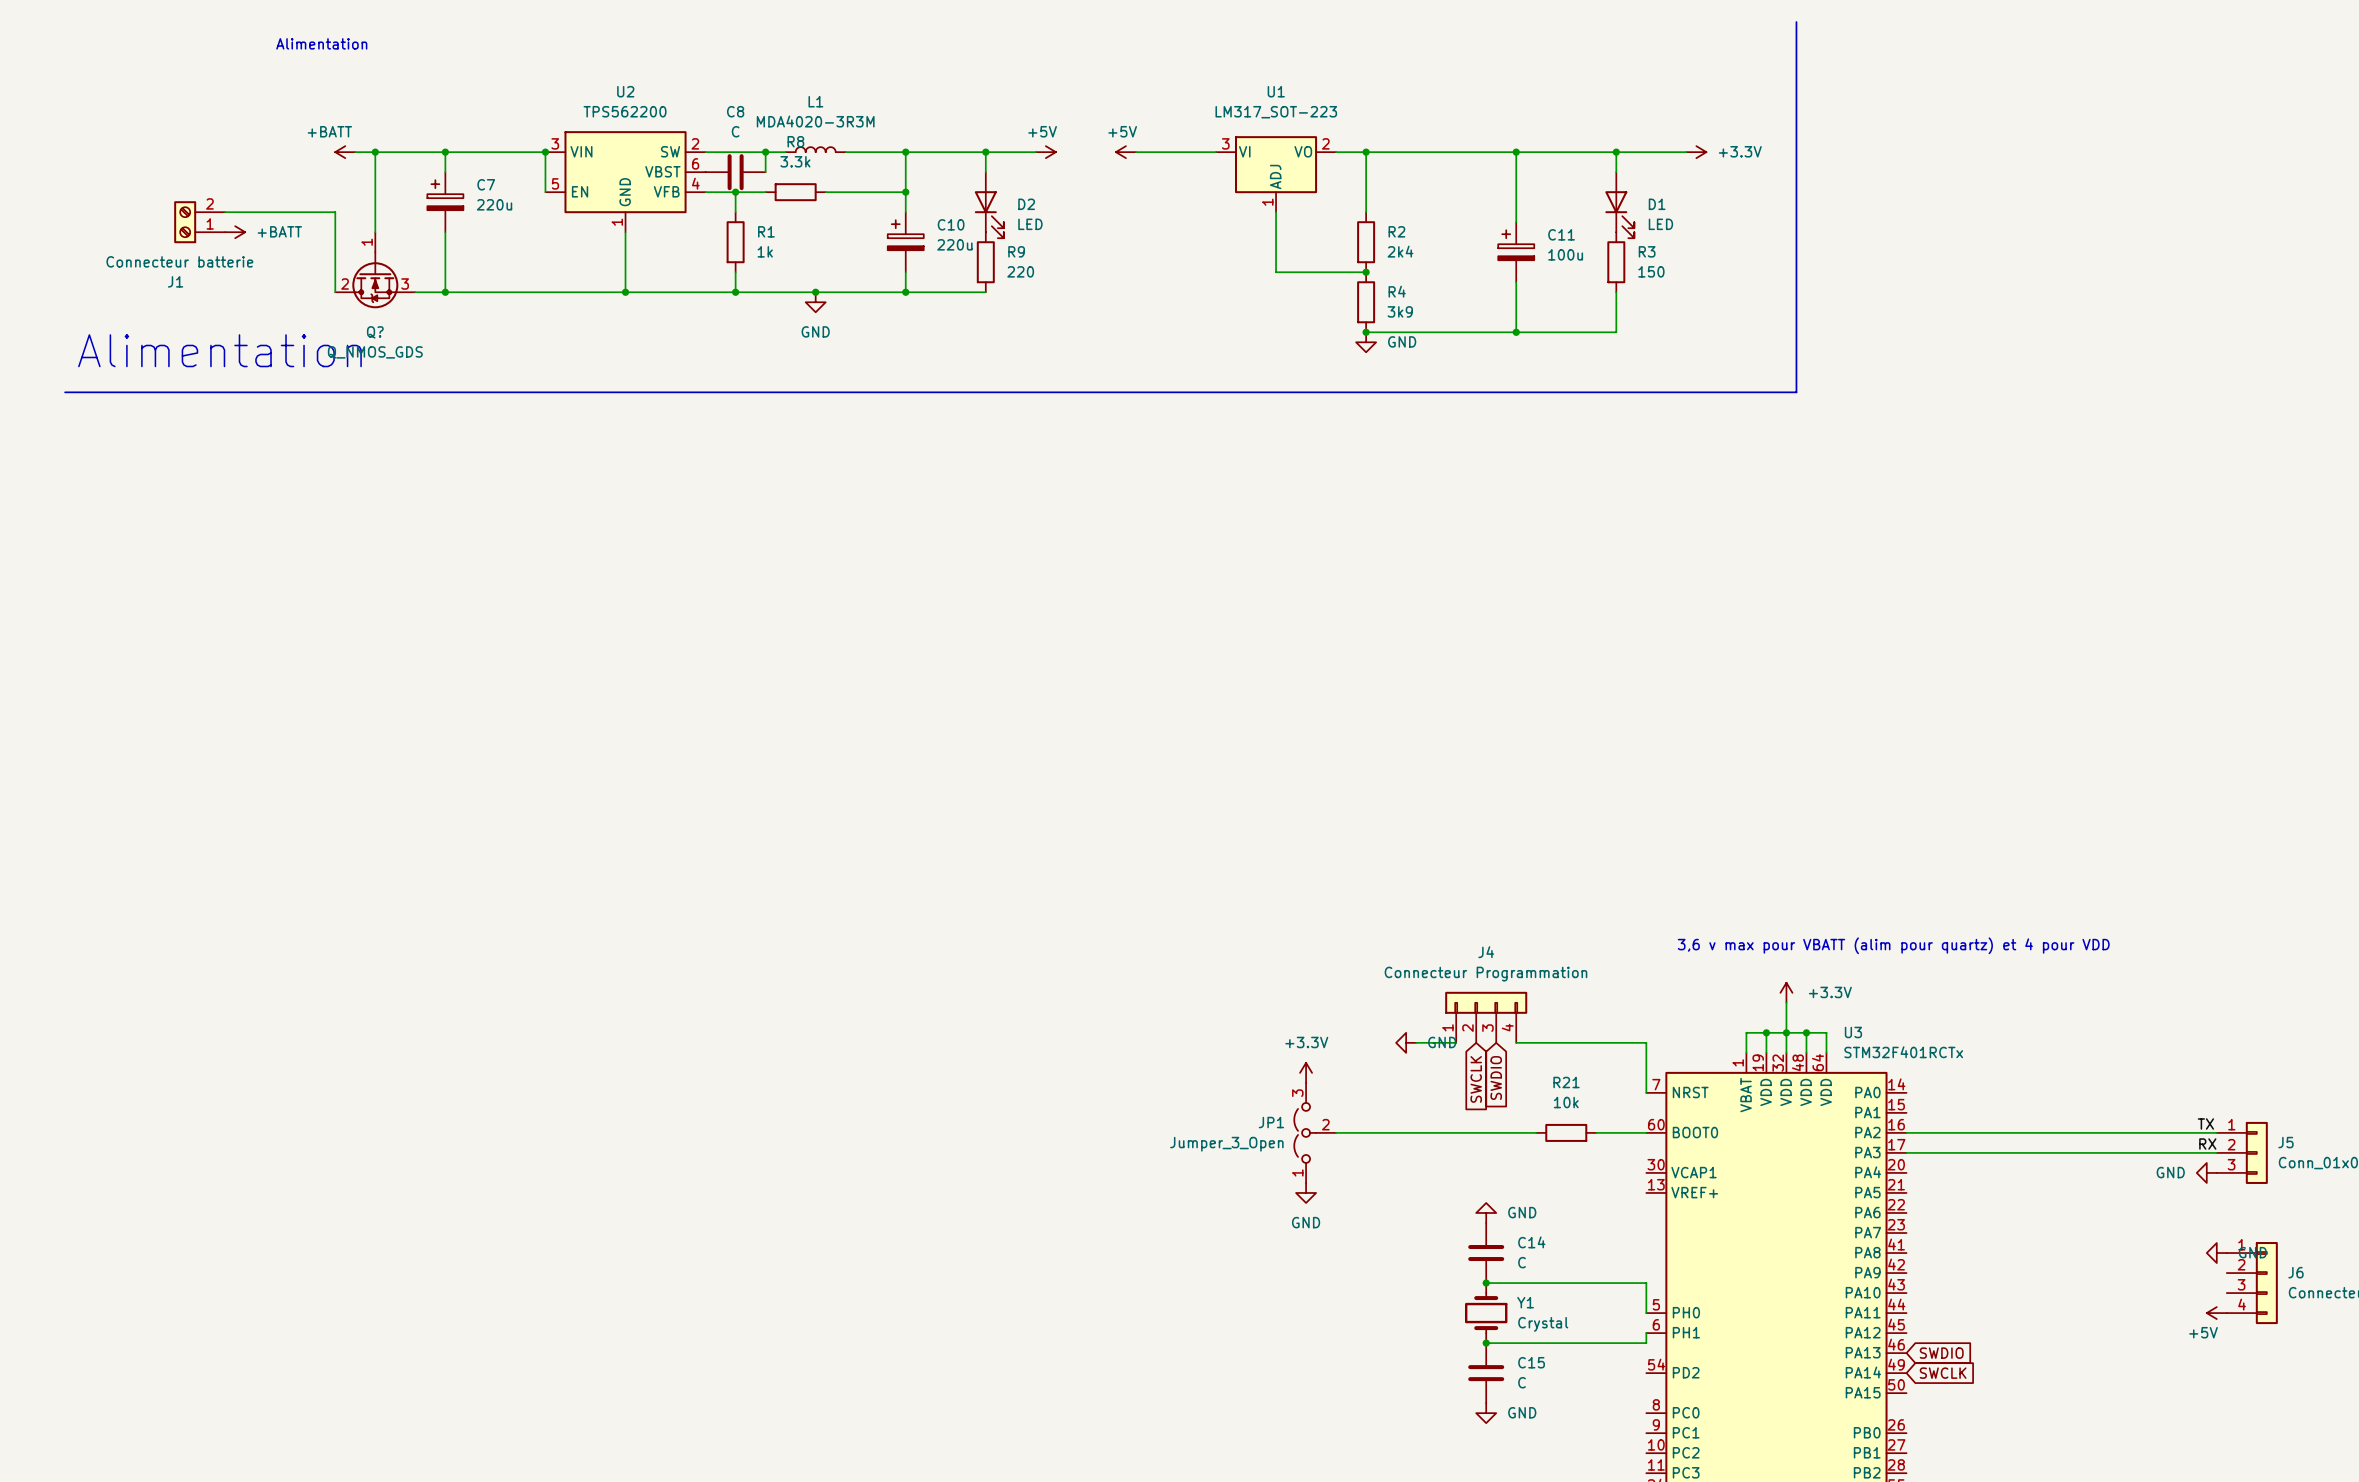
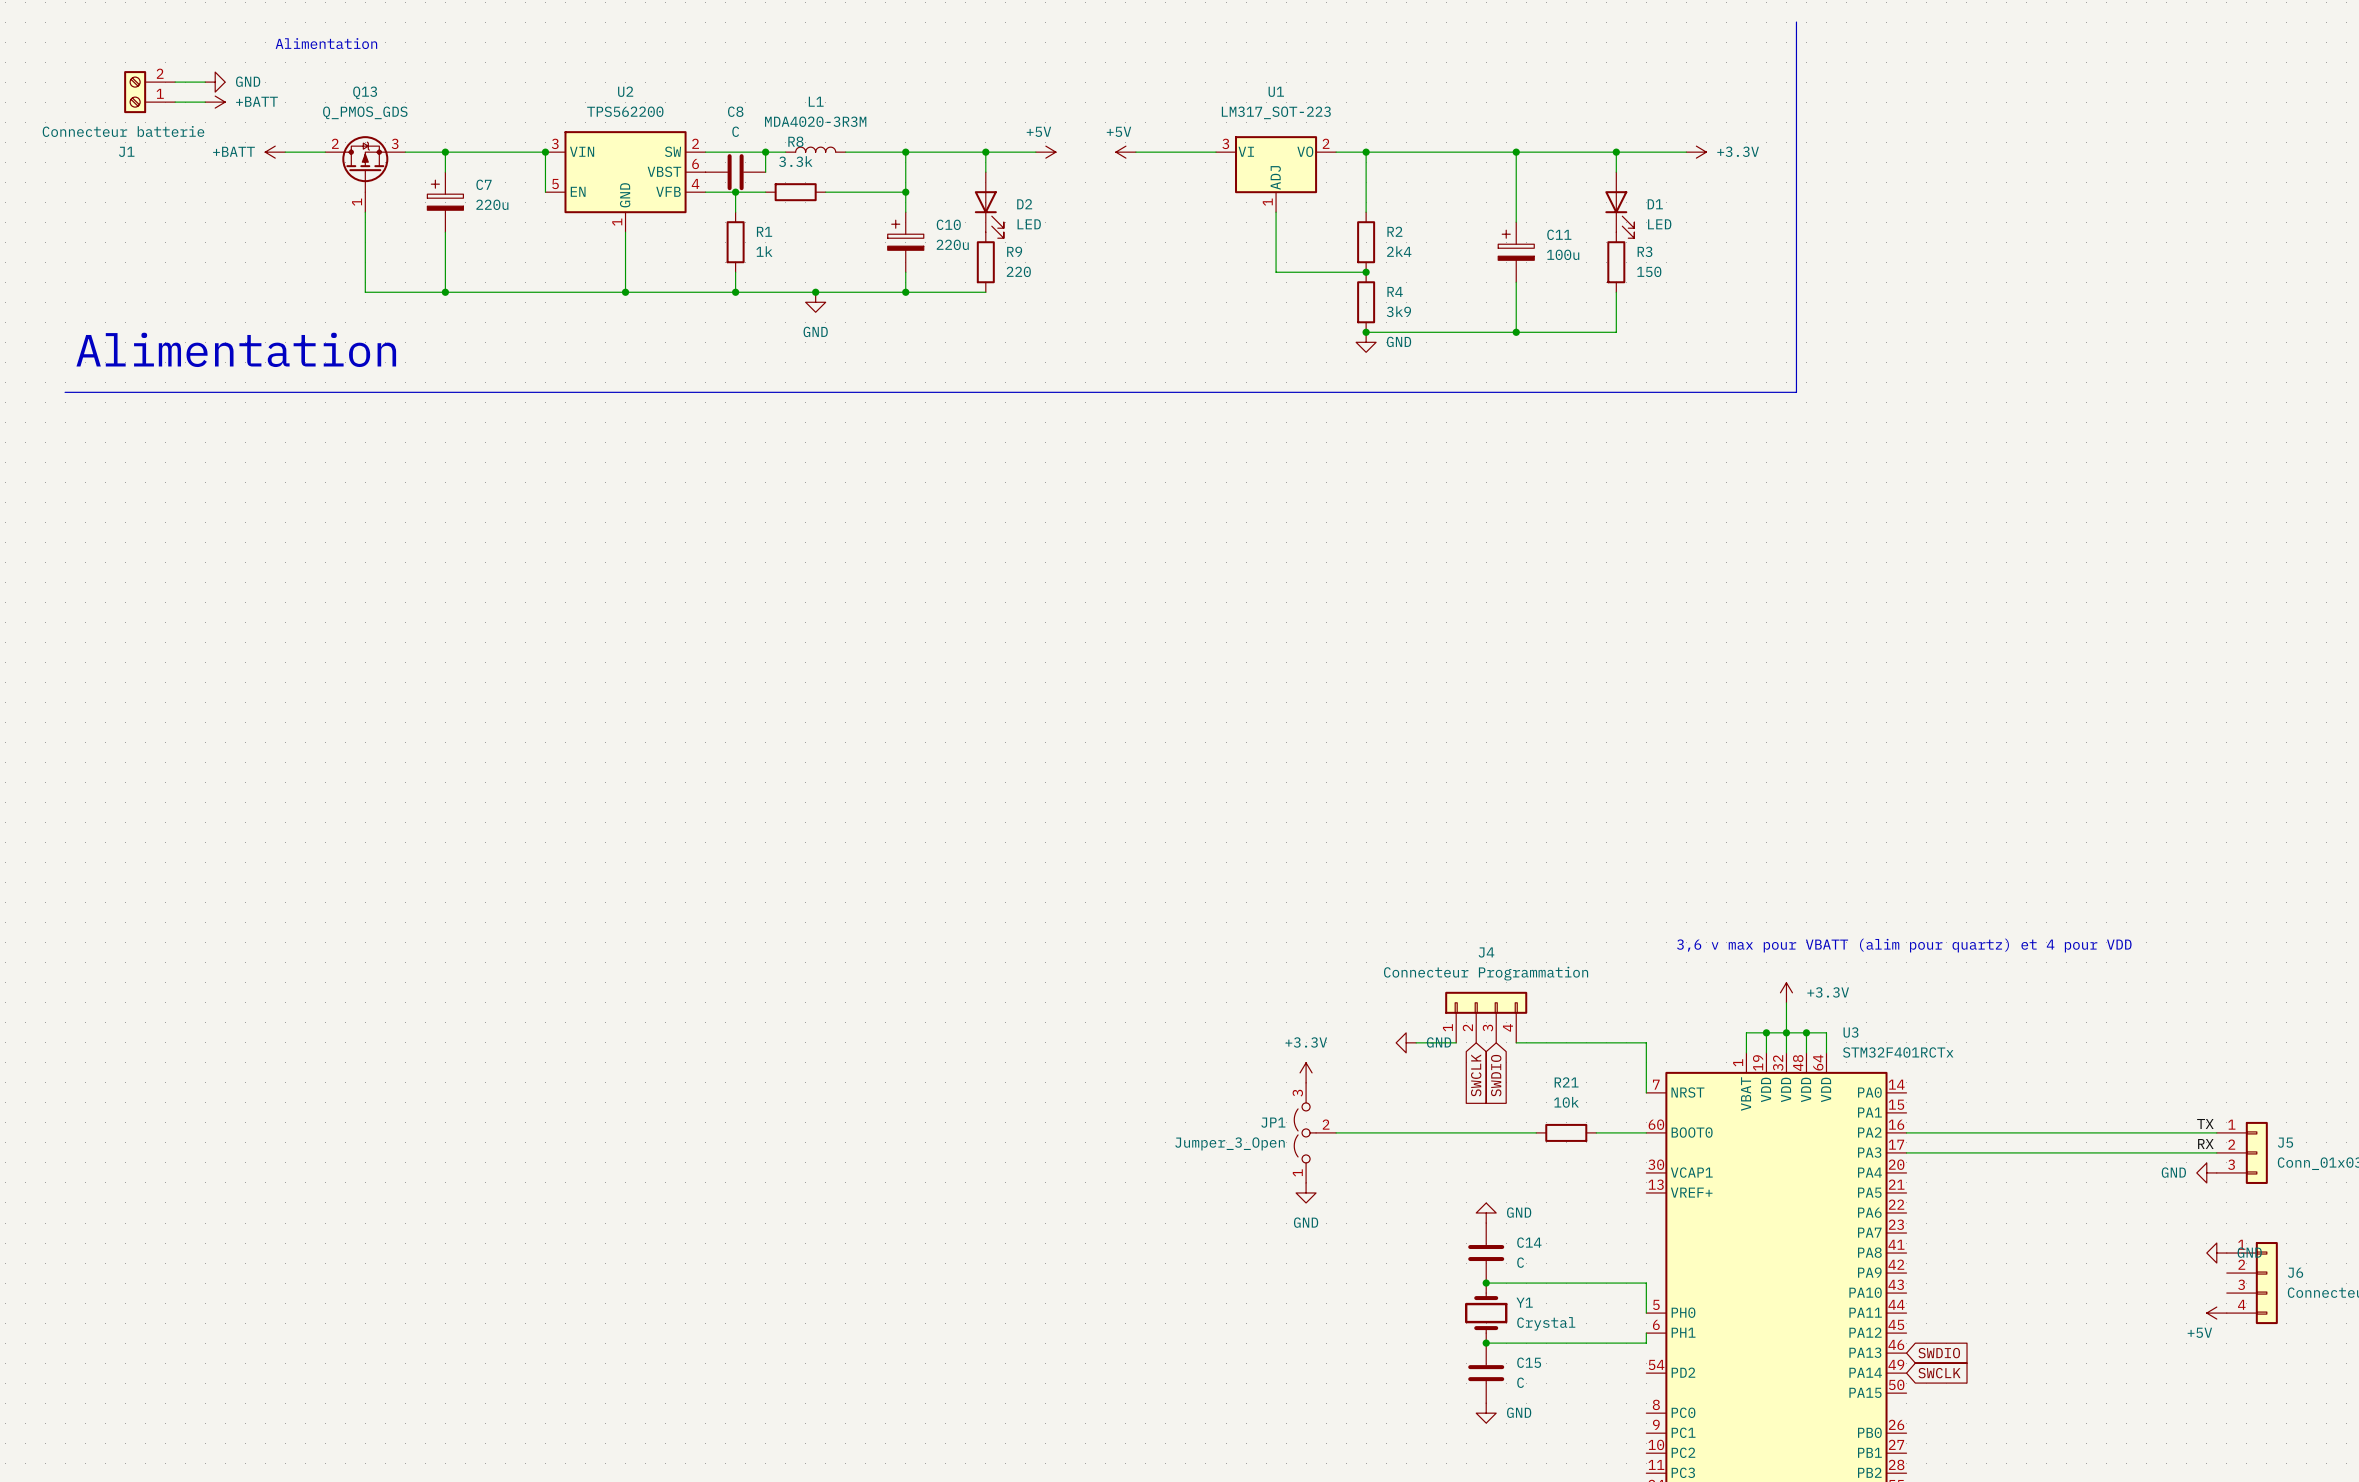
wire: none -> (175, 82) (205, 82)
power symbol: none -> GND (215, 82)
wire: none -> (175, 102) (205, 102)
power symbol: none -> +BATT (215, 102)
power symbol: none -> +BATT (275, 152)
wire: none -> (285, 152) (325, 152)
power symbol: +BATT (345, 152) -> none
wire: (375, 152) (375, 232) -> none
junction: (375, 152) -> none
Q13: none -> Q_PMOS_GDS (365, 174)
wire: (225, 212) (335, 212) (335, 292) -> none
wire: none -> (365, 212) (365, 292) (415, 292)
J1 position: (199, 222) -> (149, 92)
power symbol: +BATT (235, 232) -> none
Q?: Q_NMOS_GDS (375, 270) -> none

